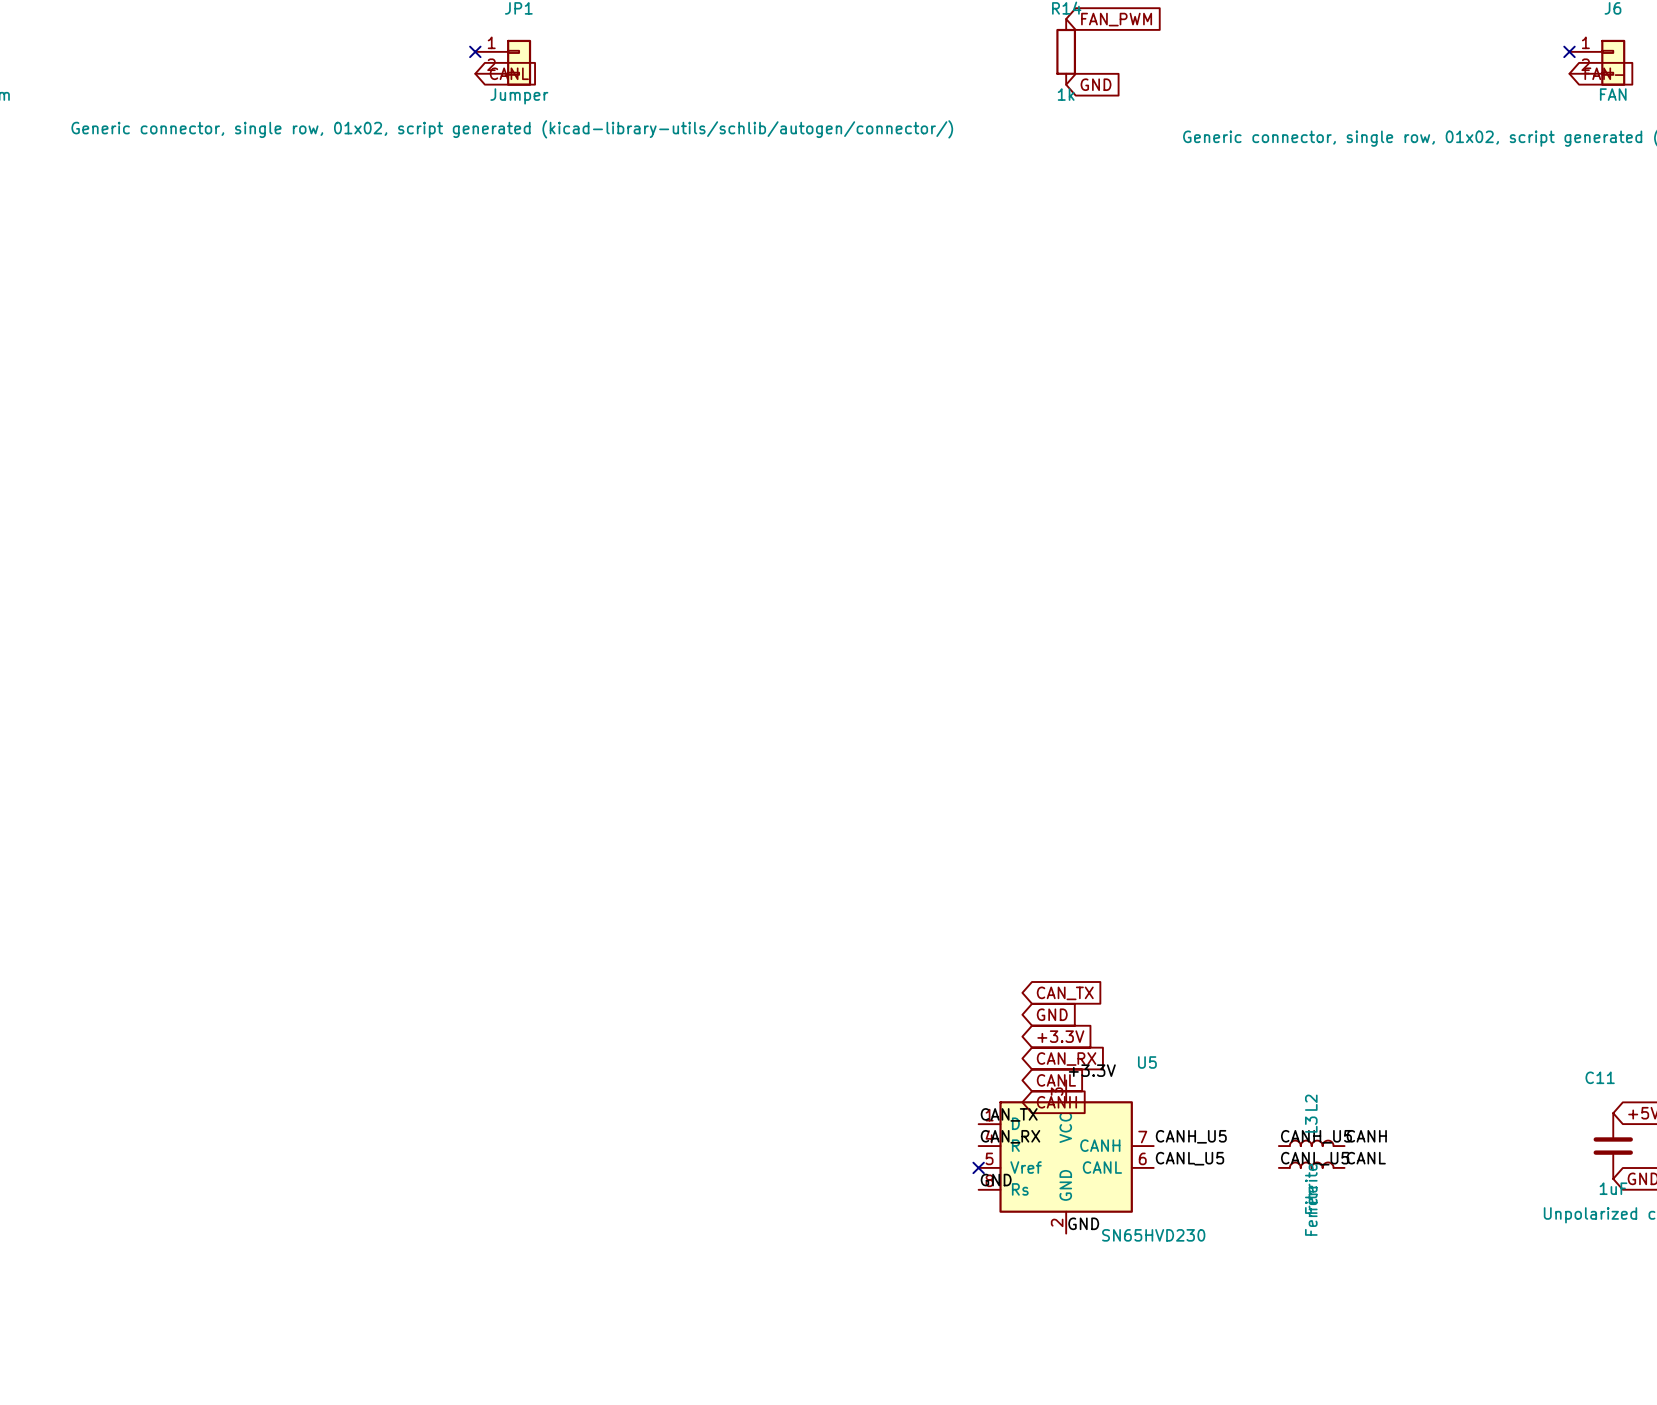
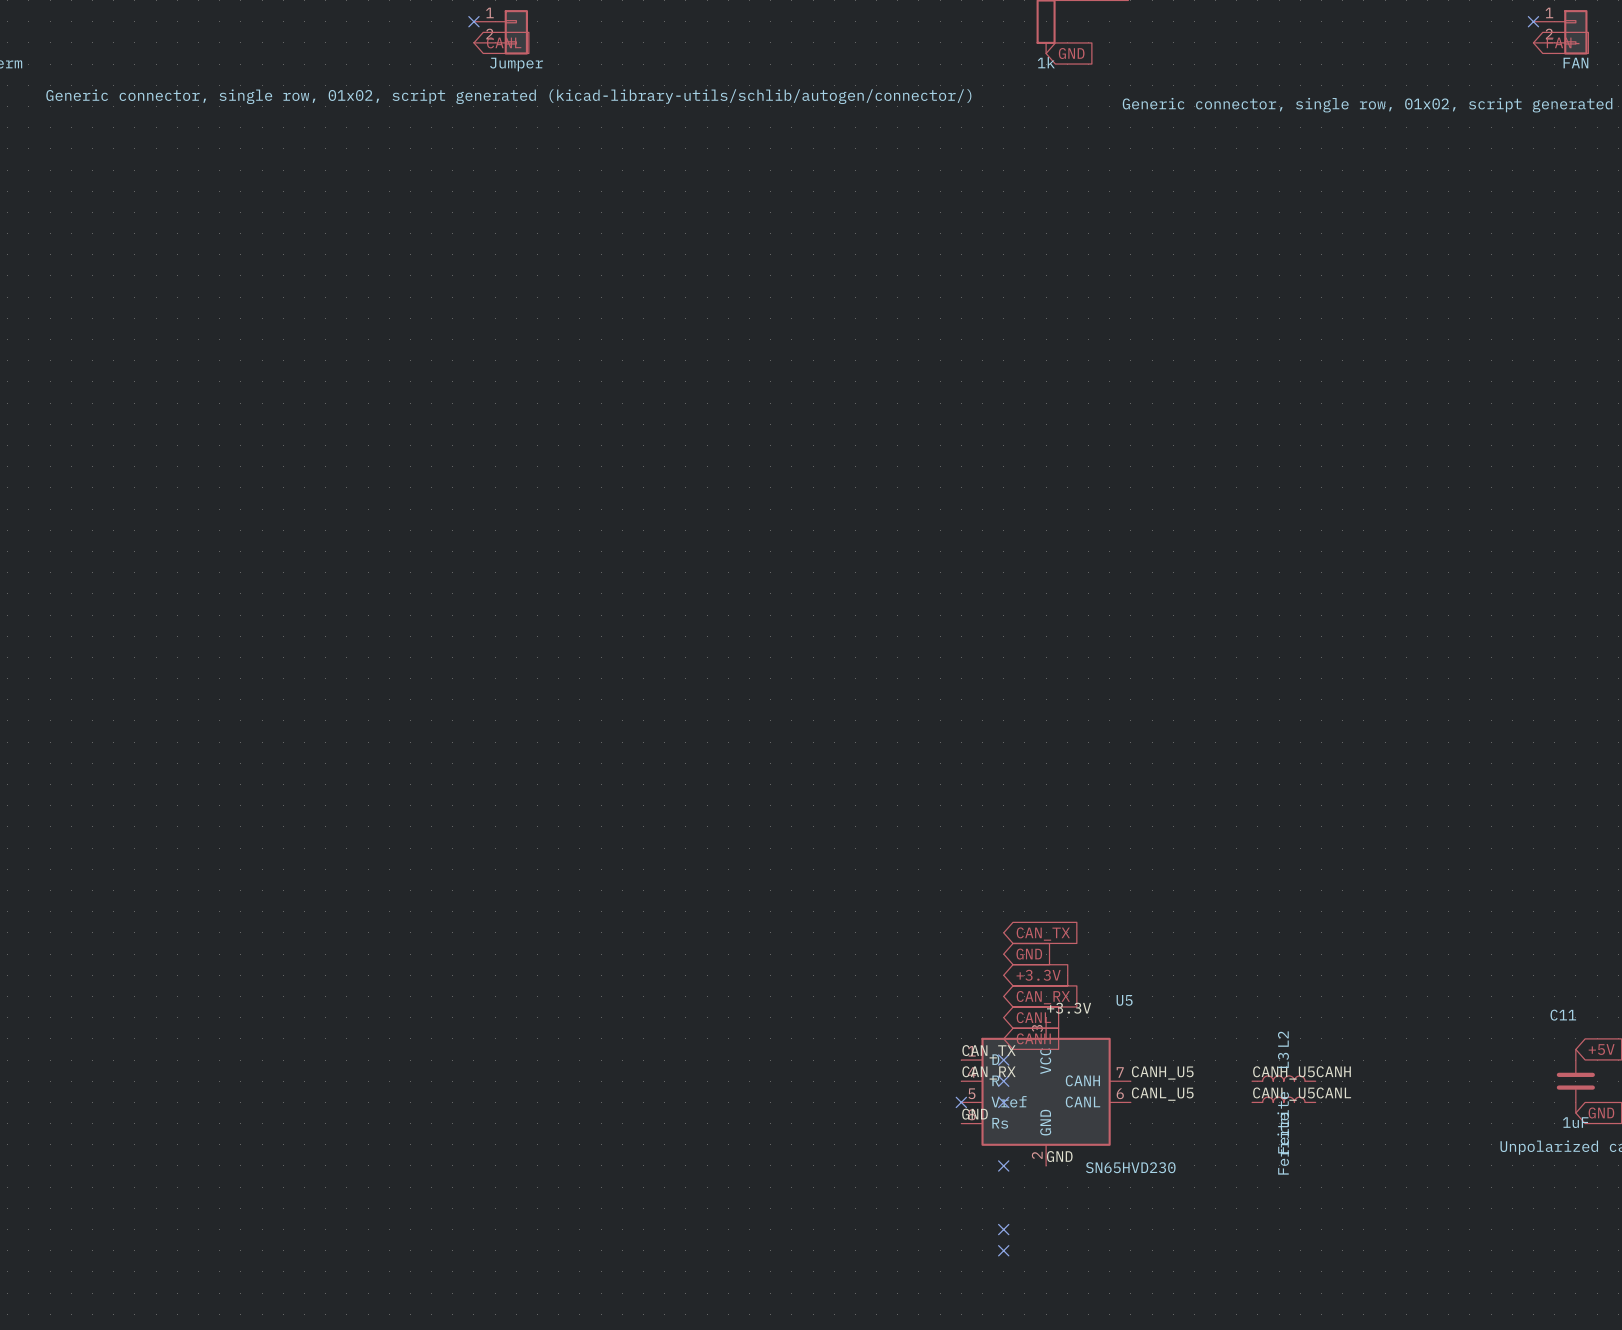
no-connect mark: none -> (1003, 1060)
no-connect mark: none -> (1003, 1081)
no-connect mark: none -> (1003, 1102)
no-connect mark: none -> (1003, 1165)
no-connect mark: none -> (1003, 1229)
no-connect mark: none -> (1003, 1250)

